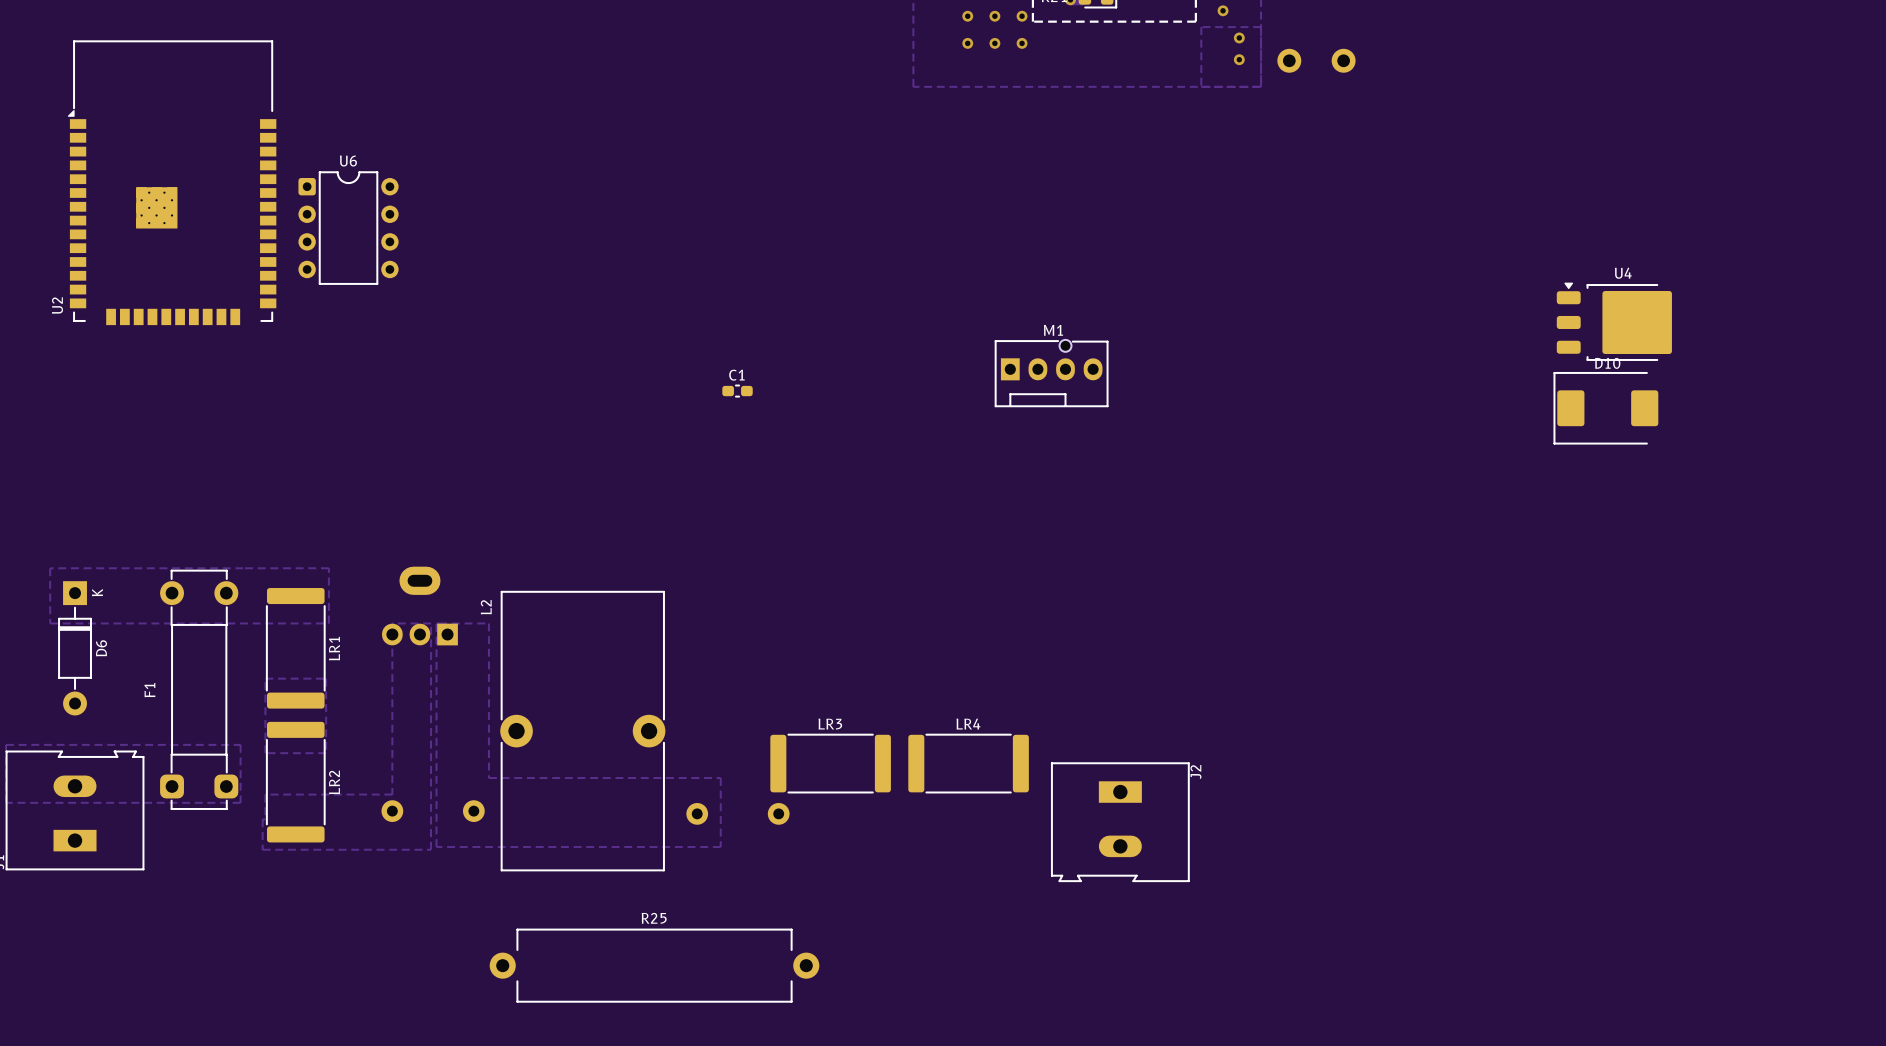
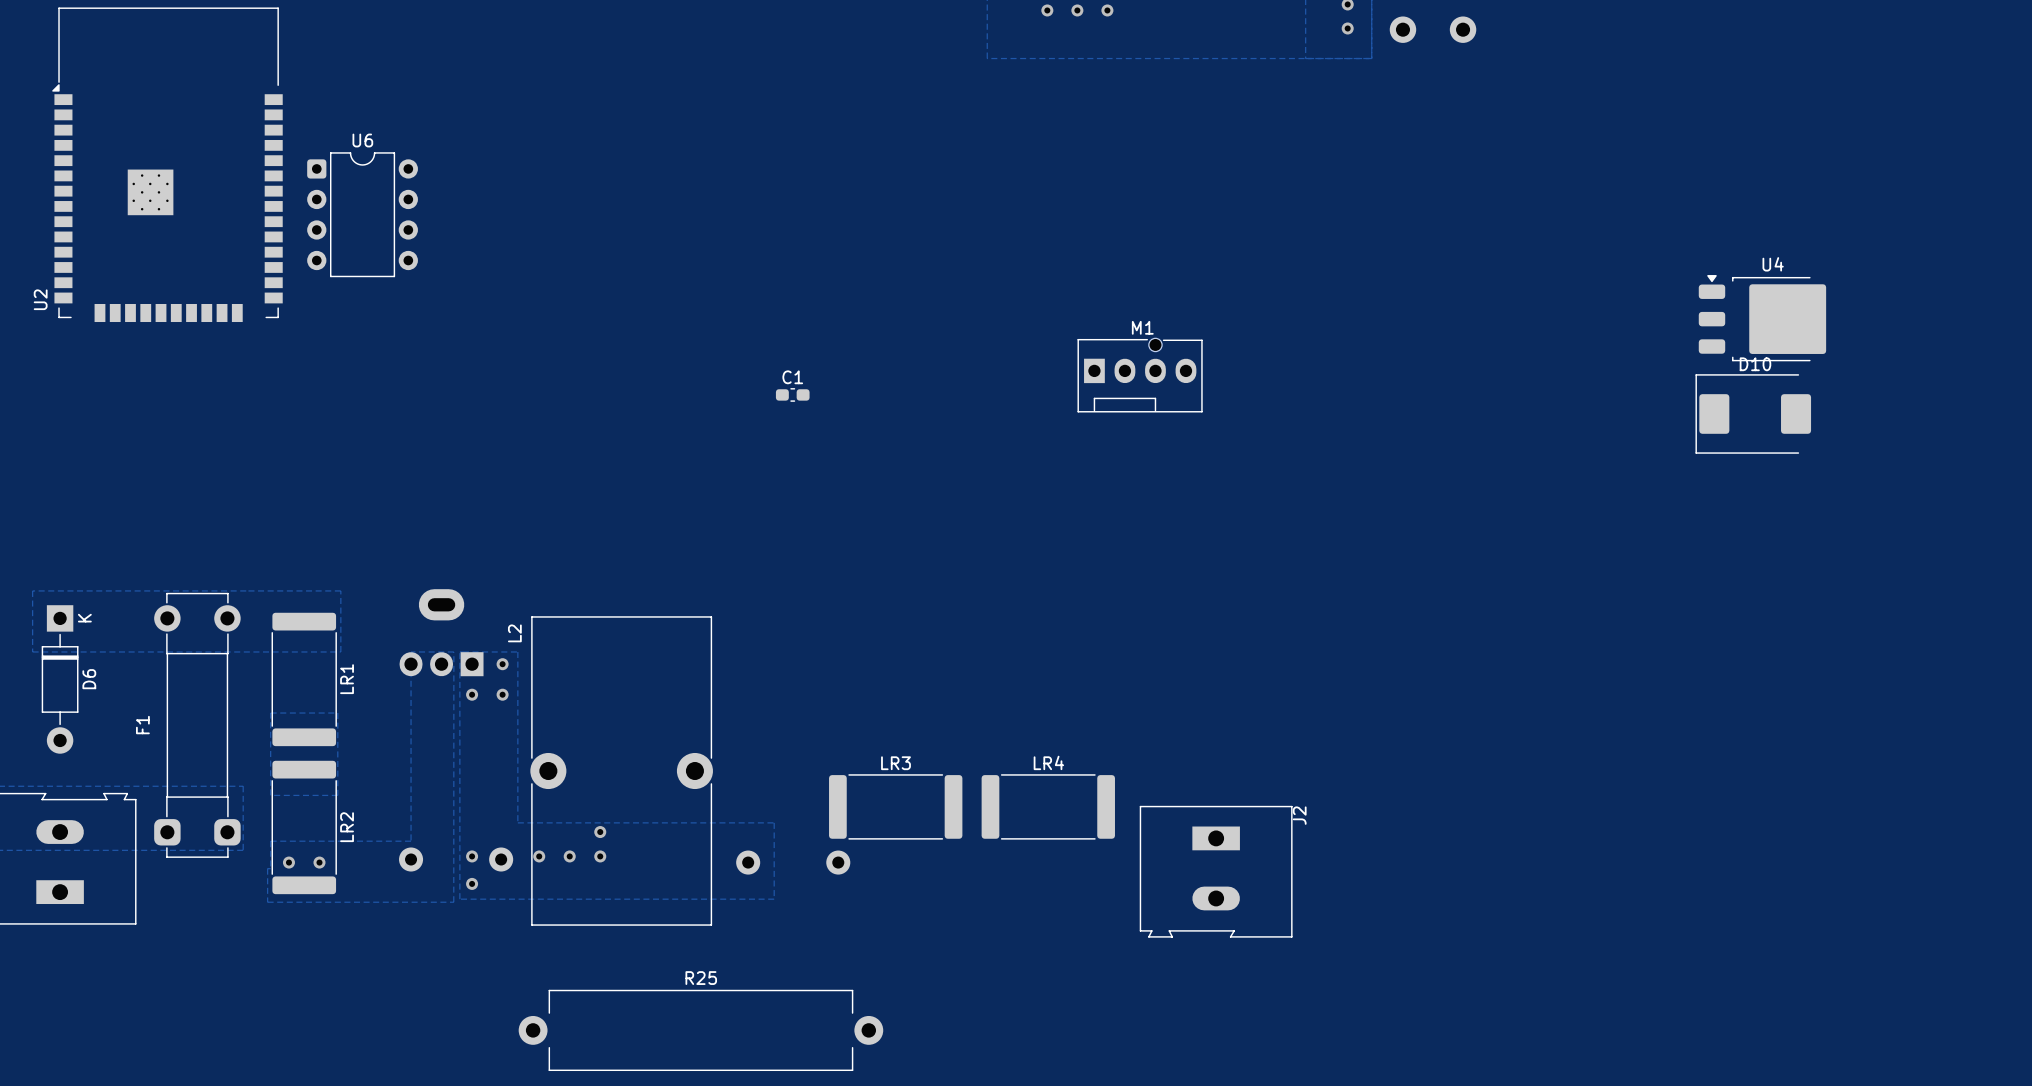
via: none -> (502, 664)
via: none -> (472, 694)
via: none -> (502, 694)
via: none -> (600, 832)
via: none -> (472, 856)
via: none -> (539, 856)
via: none -> (569, 856)
via: none -> (600, 856)
via: none -> (288, 862)
via: none -> (319, 862)
via: none -> (472, 883)

